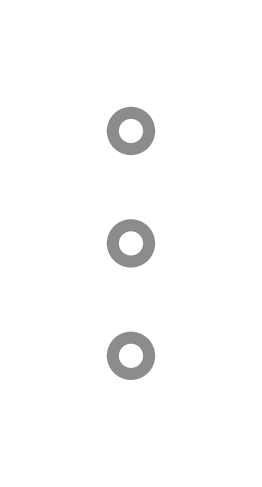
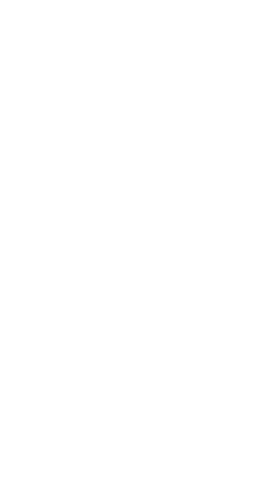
part: (130, 130) -> none
part: (130, 243) -> none
part: (130, 355) -> none

